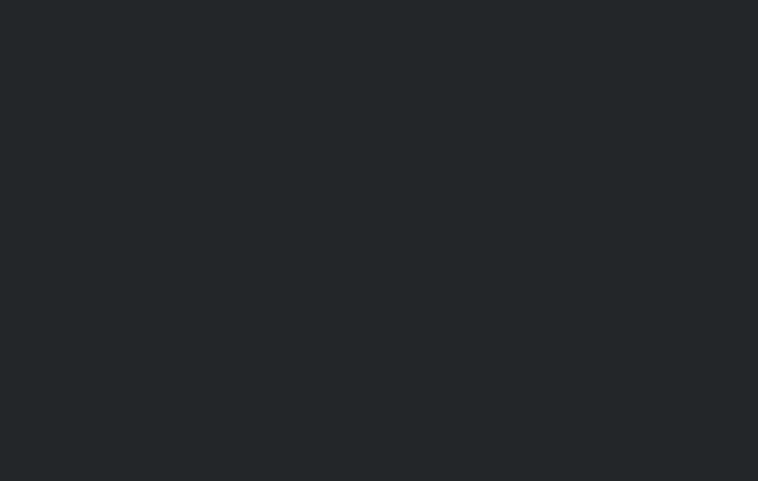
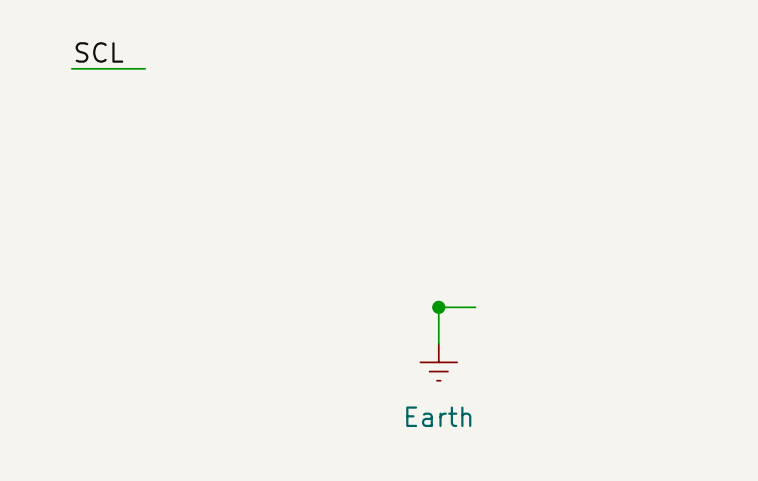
label: none -> SCL (99, 52)
wire: none -> (71, 68) (145, 68)
junction: none -> (438, 307)
wire: none -> (475, 307) (438, 307) (438, 344)
power symbol: none -> Earth (438, 362)

